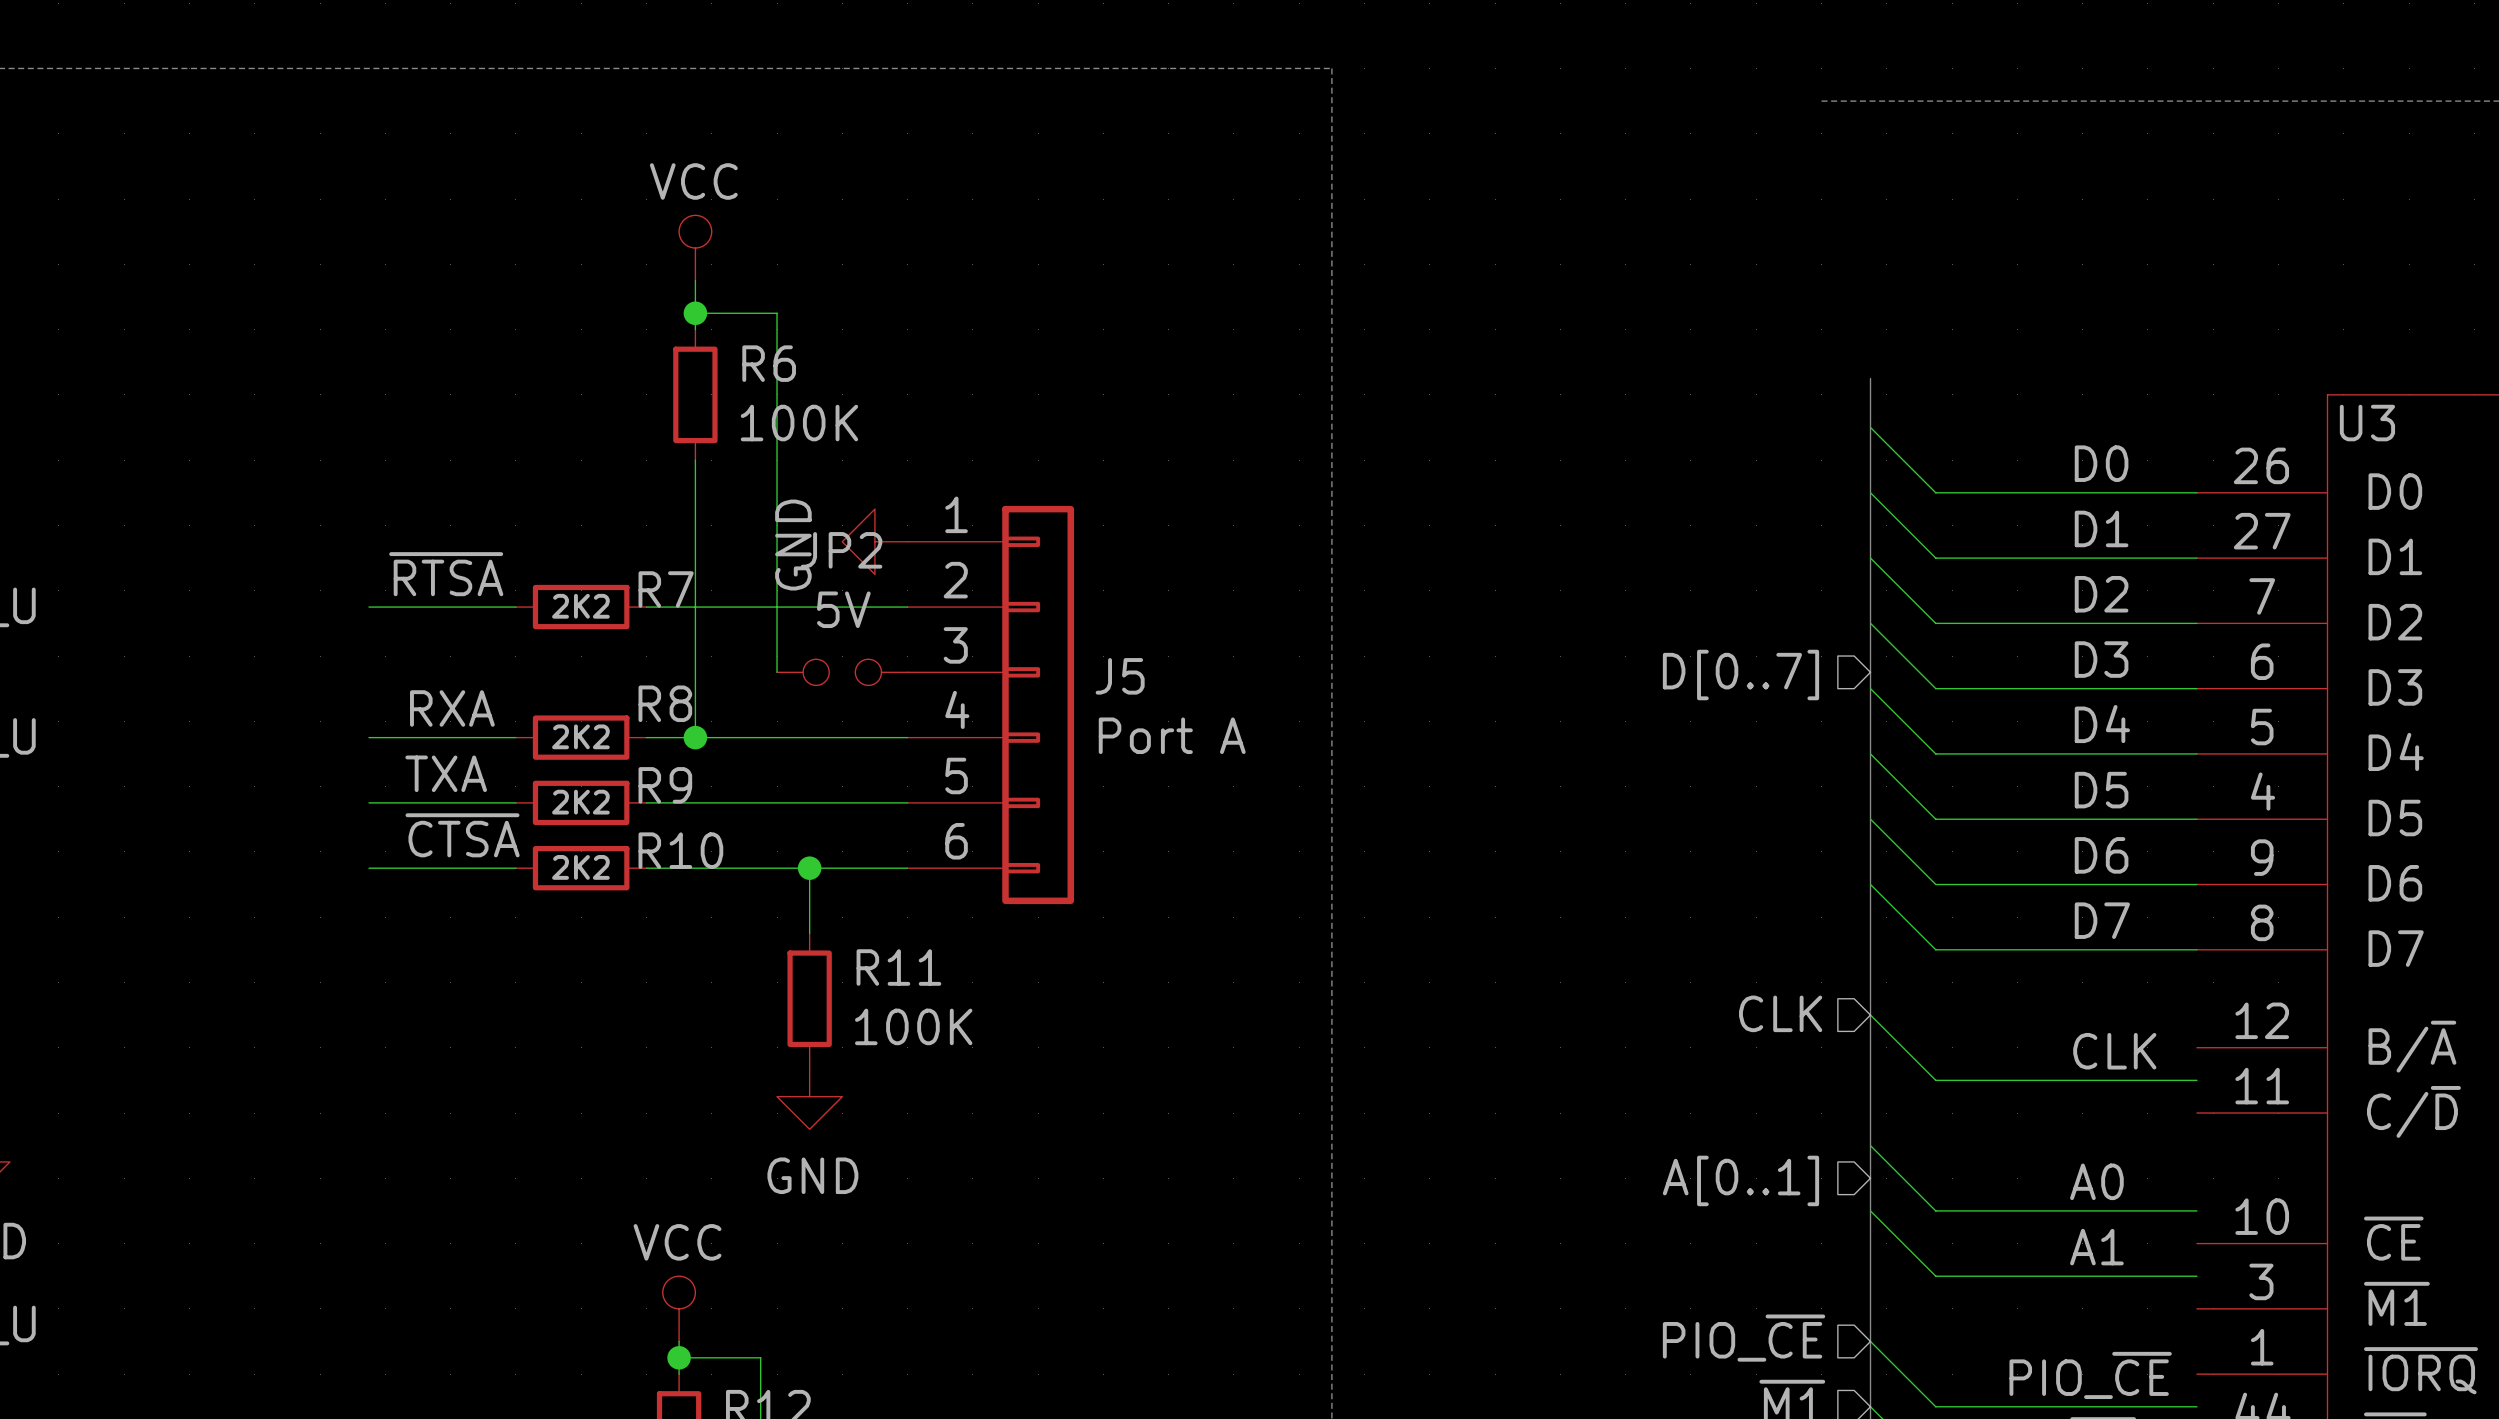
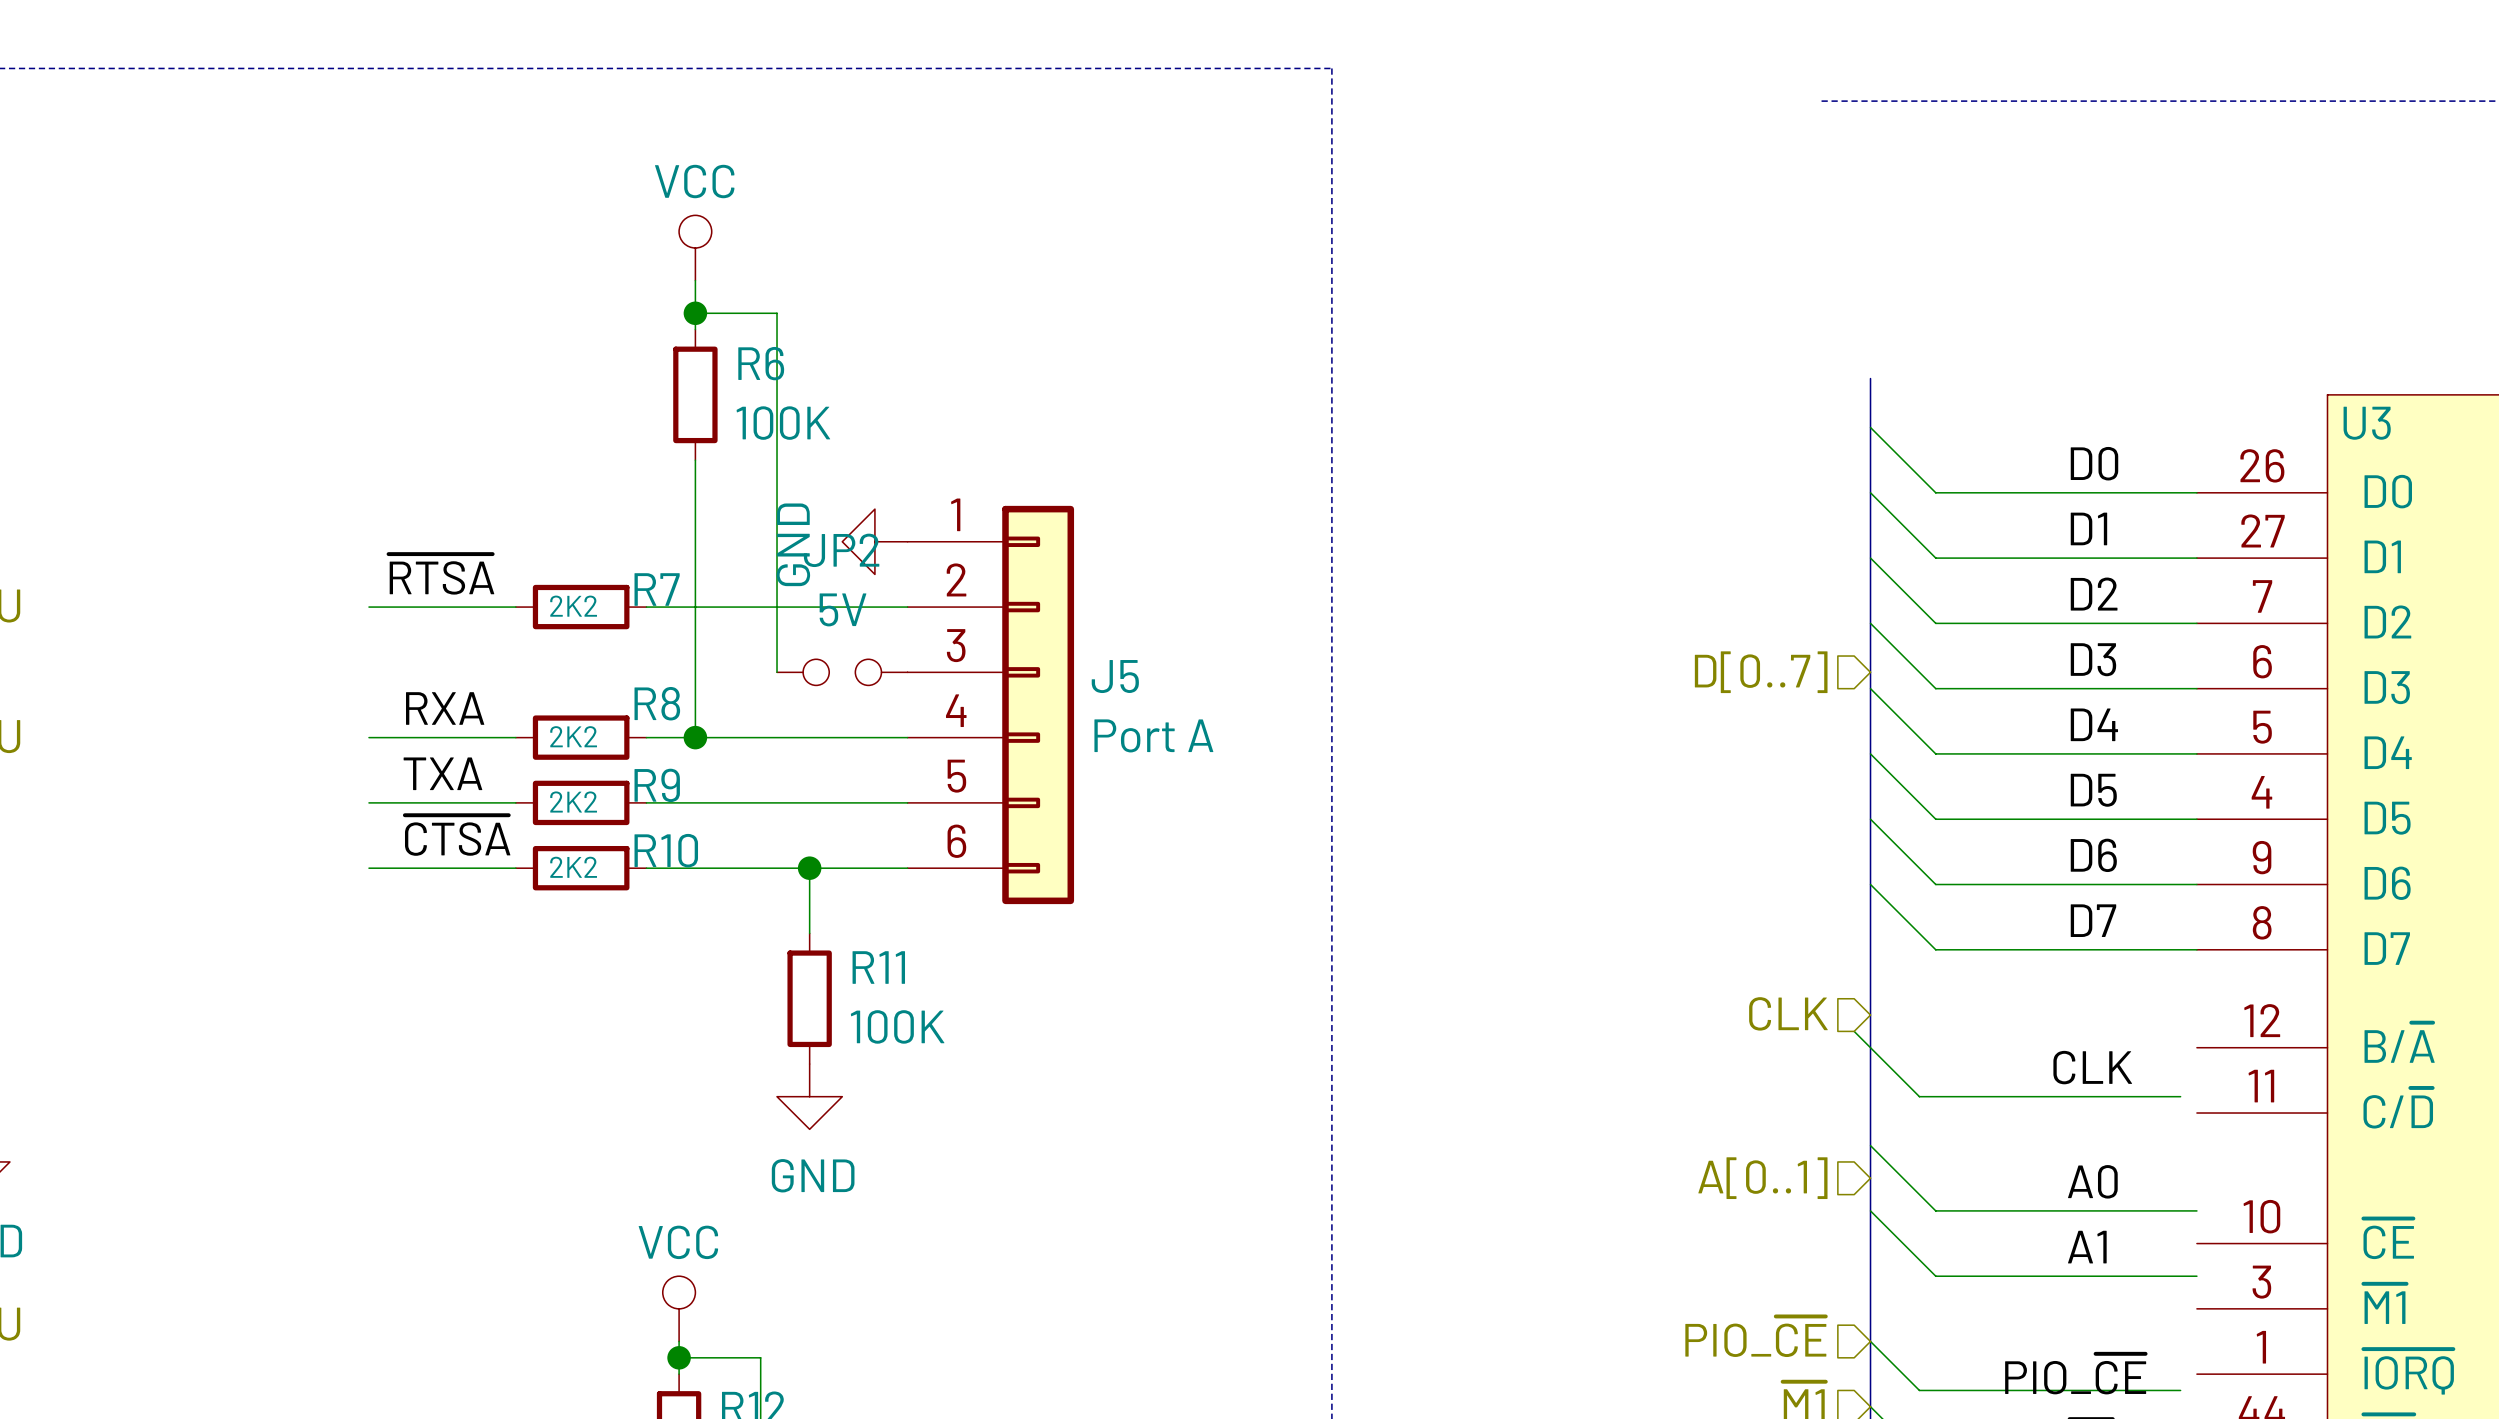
wire: (1870, 1015) (1935, 1080) (2196, 1080) -> (1854, 1031) (1919, 1096) (2180, 1096)
label position: CLK (2114, 1051) -> CLK (2092, 1067)
wire: (1919, 1390) (1935, 1406) (2196, 1406) -> (1919, 1390) (2180, 1390)

